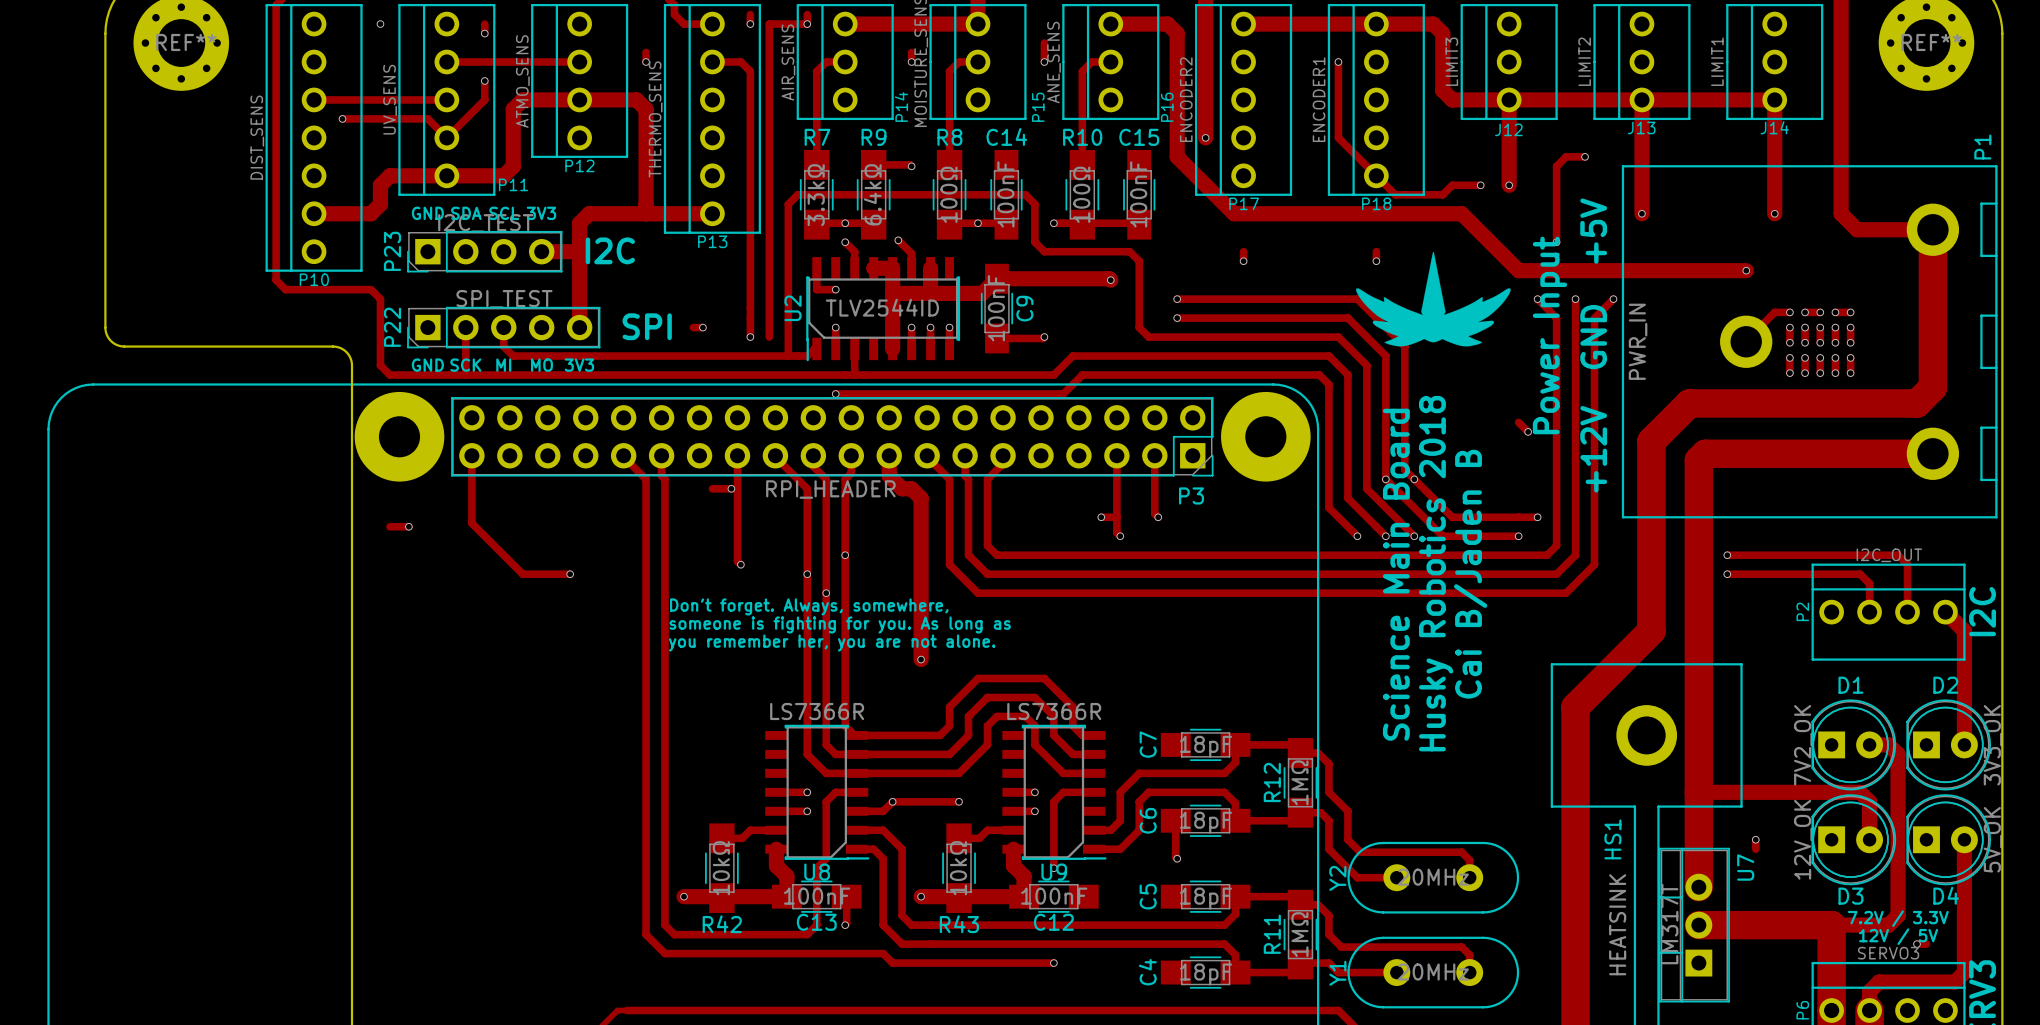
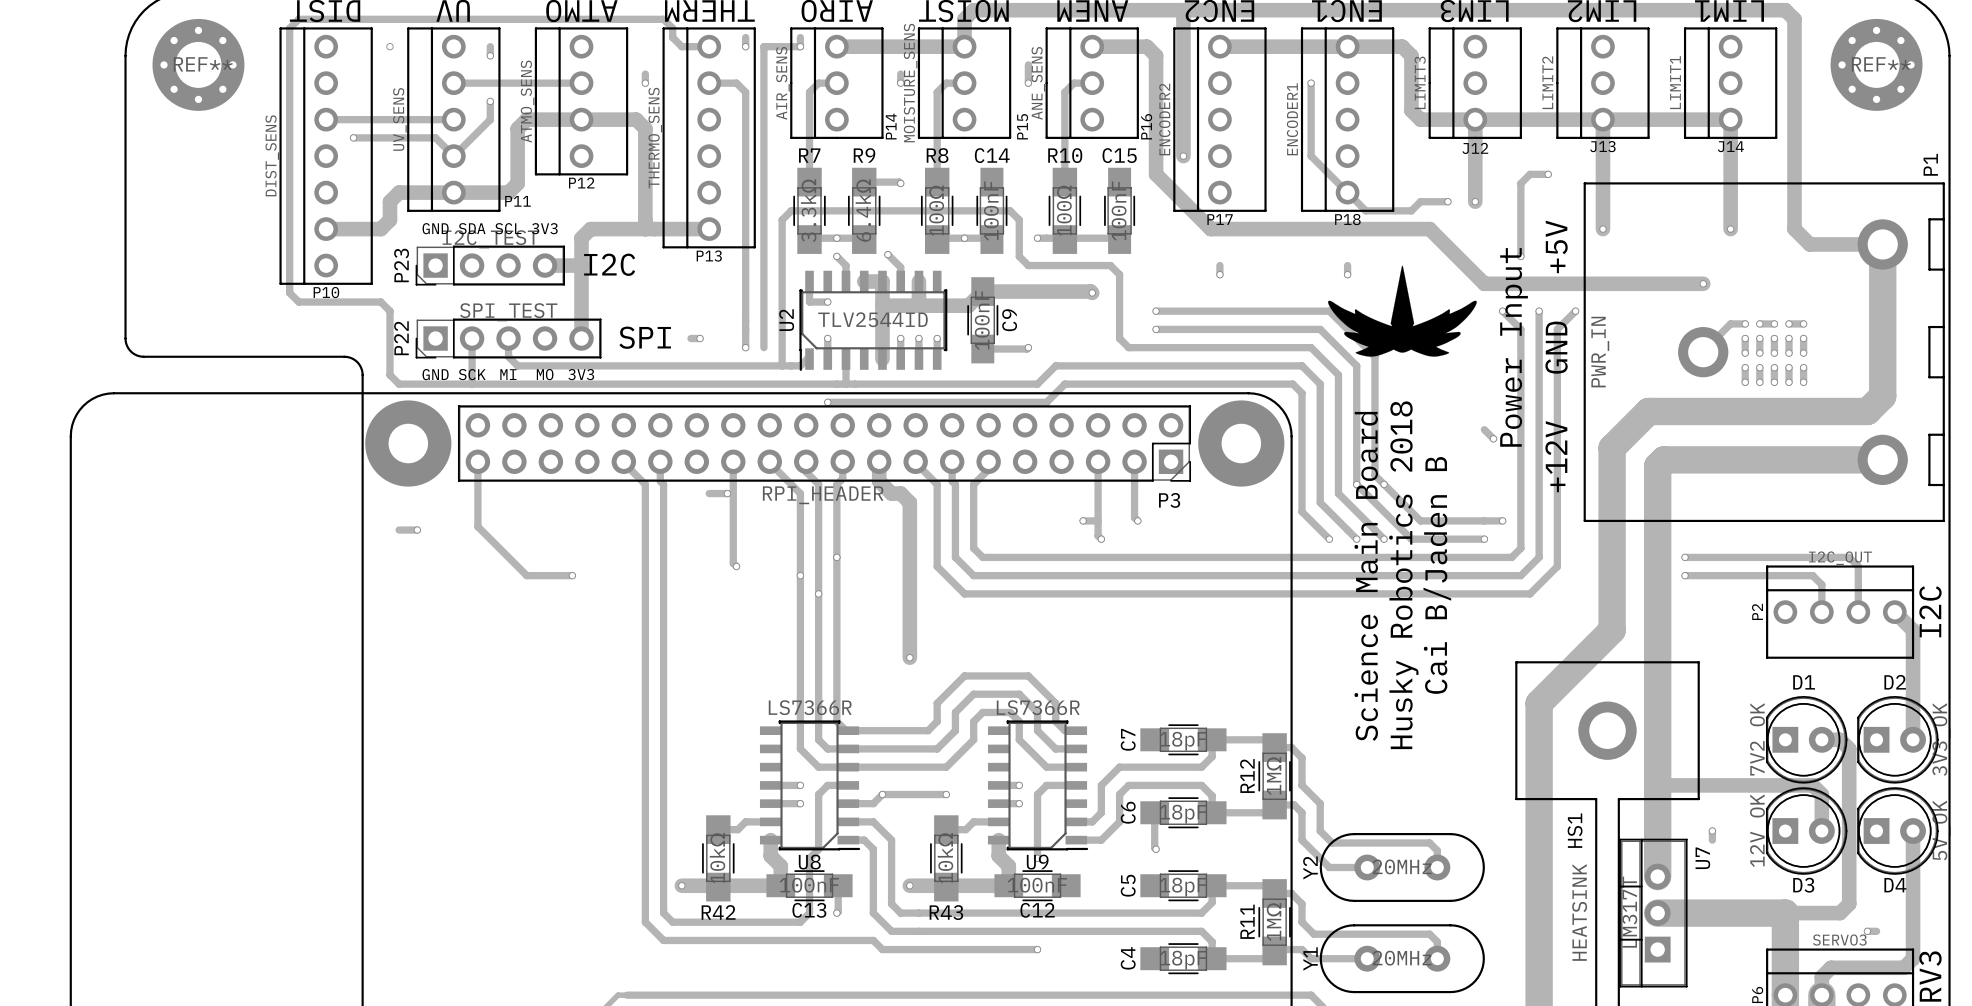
text: Don't forget. Always, somewhere, (809, 606) -> none
text: someone is fighting for you. As long as (840, 624) -> none
text: you remember her, you are not alone. (832, 642) -> none
text: 7.2V / 3.3V (1898, 918) -> none
text: 12V / 5V (1898, 936) -> none

